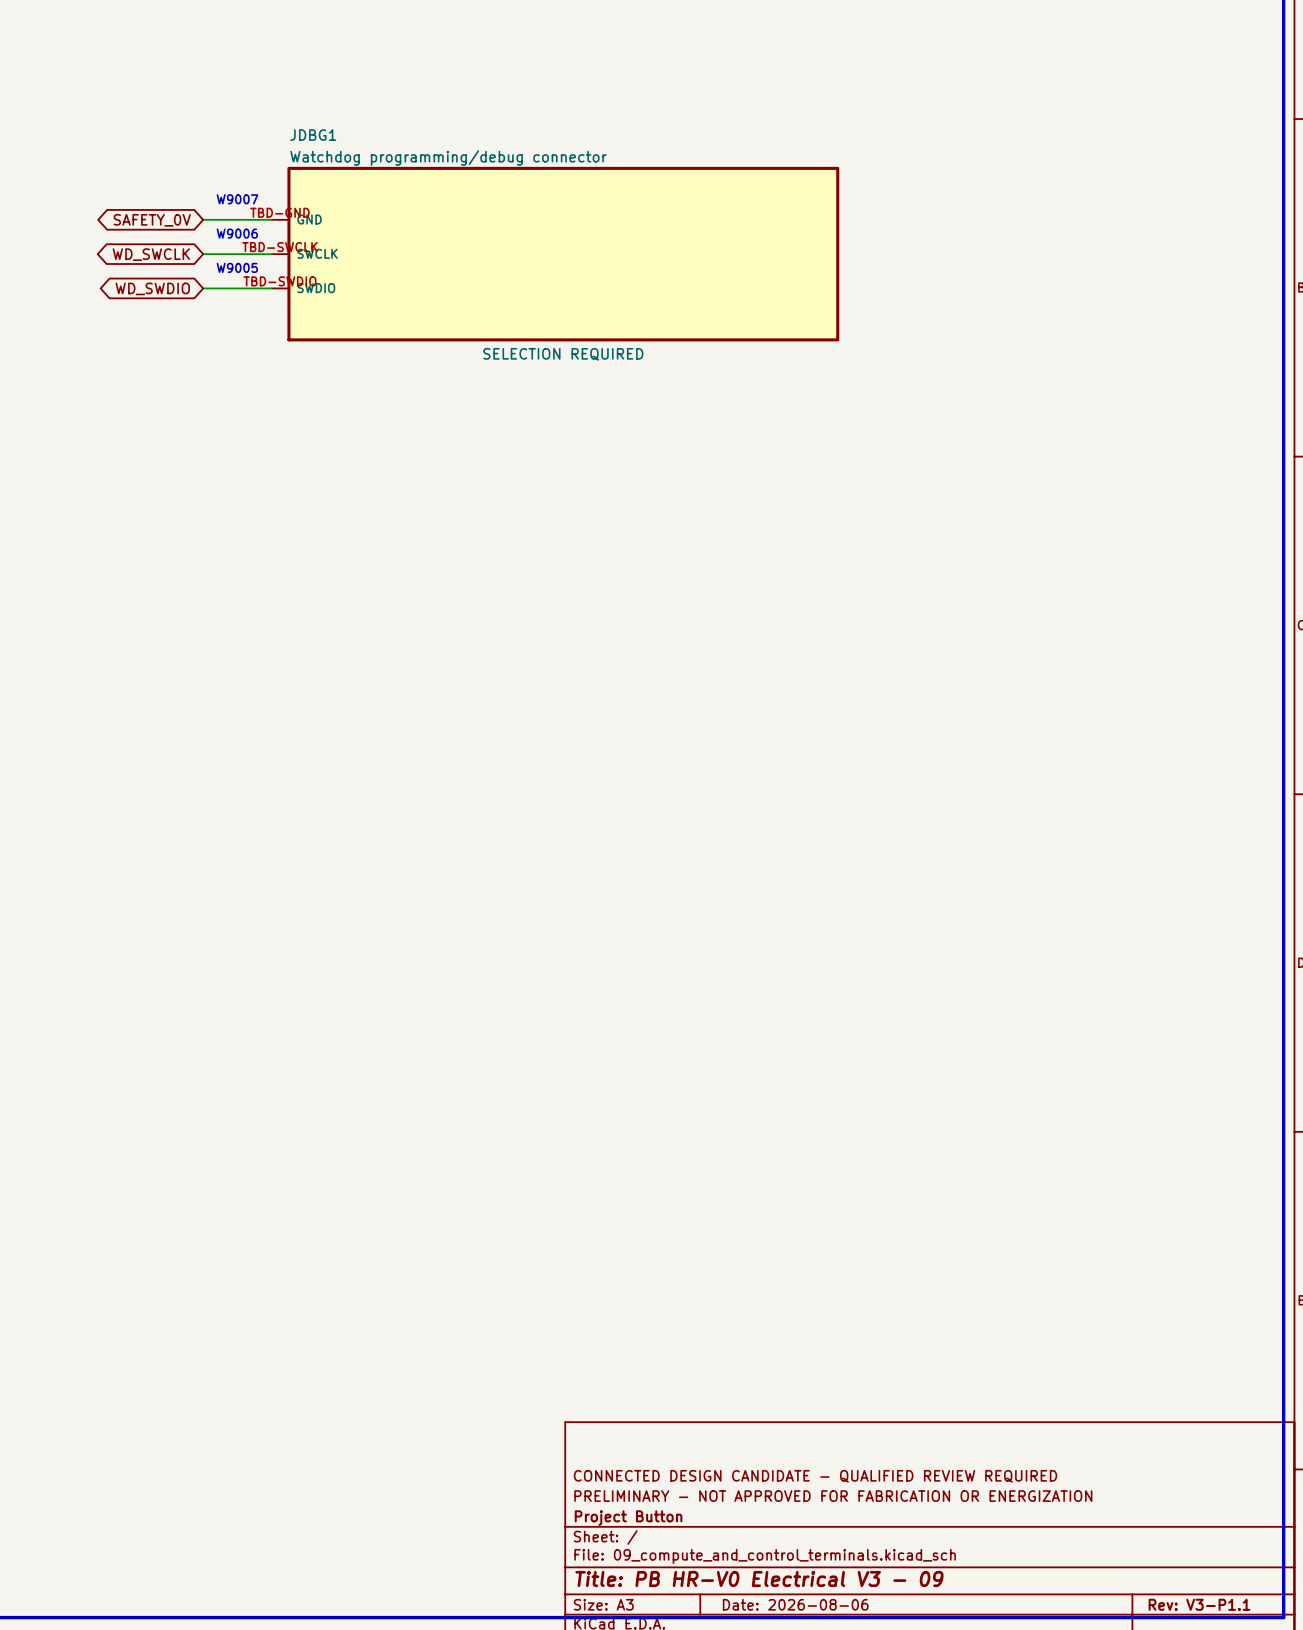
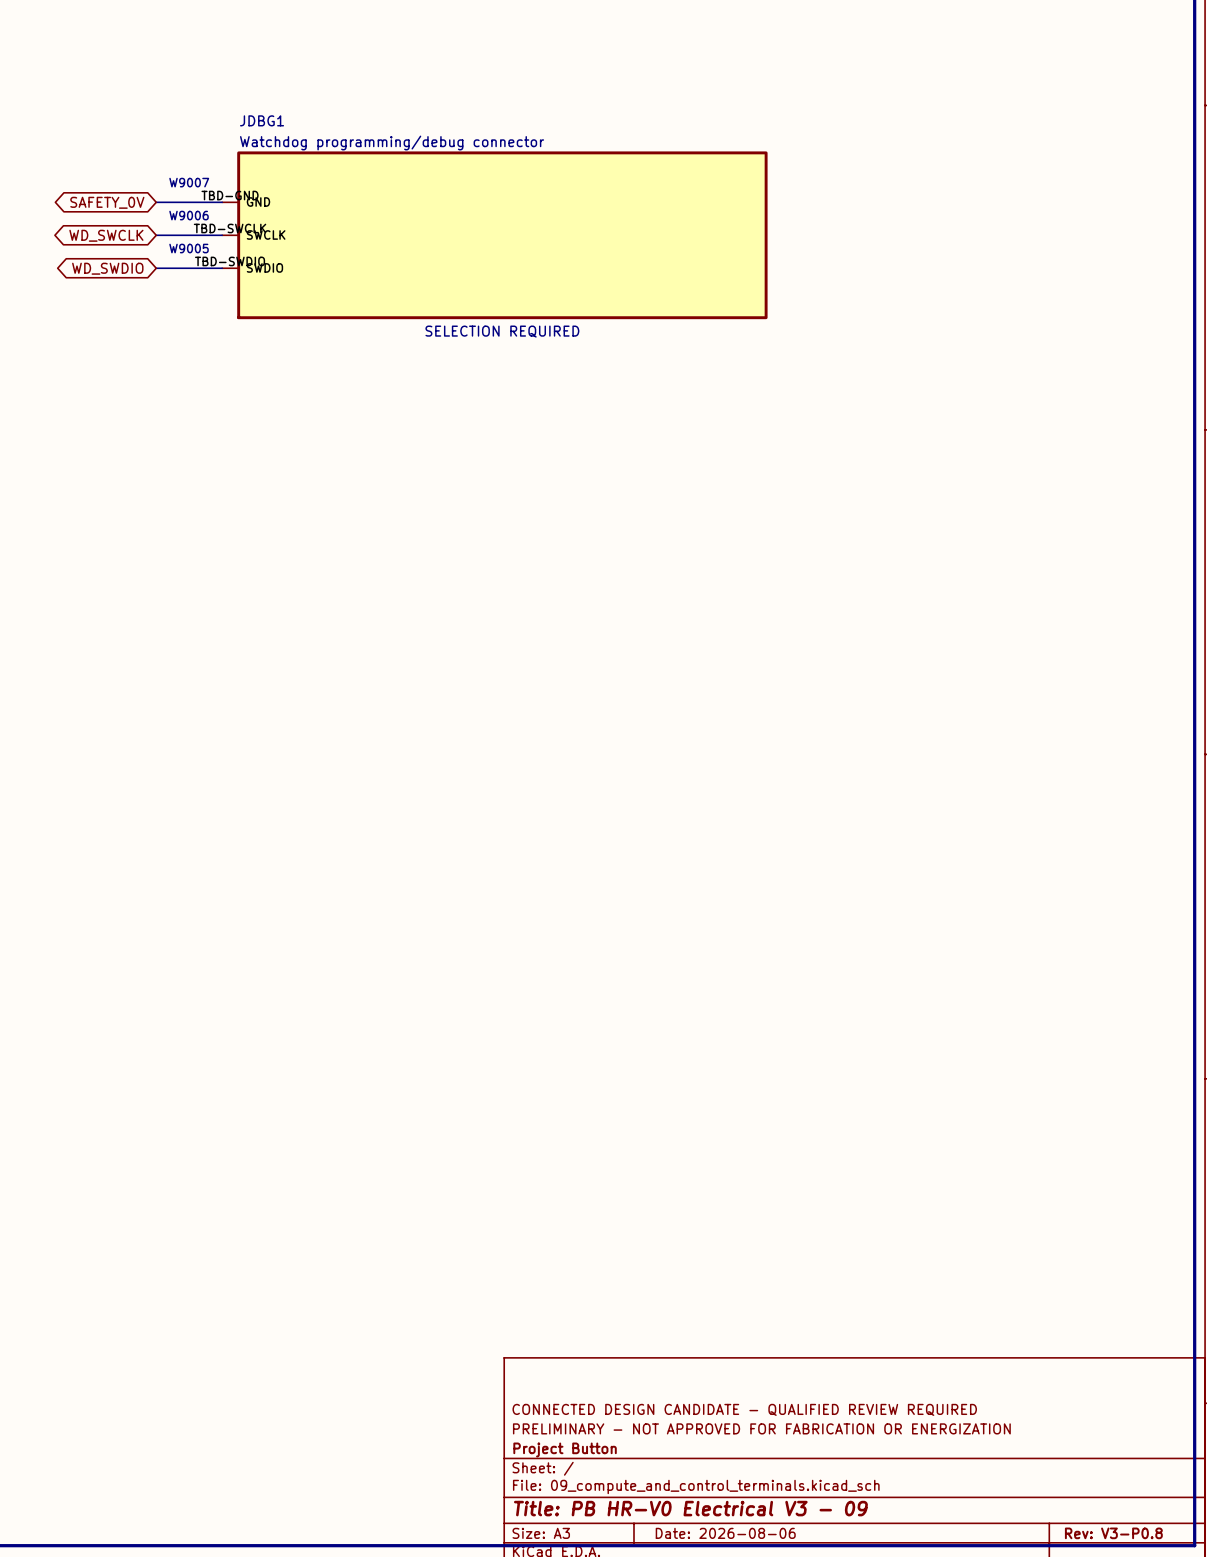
title block: Rev: V3-P1.1 (1199, 1604) -> Rev: V3-P0.8 (1113, 1533)

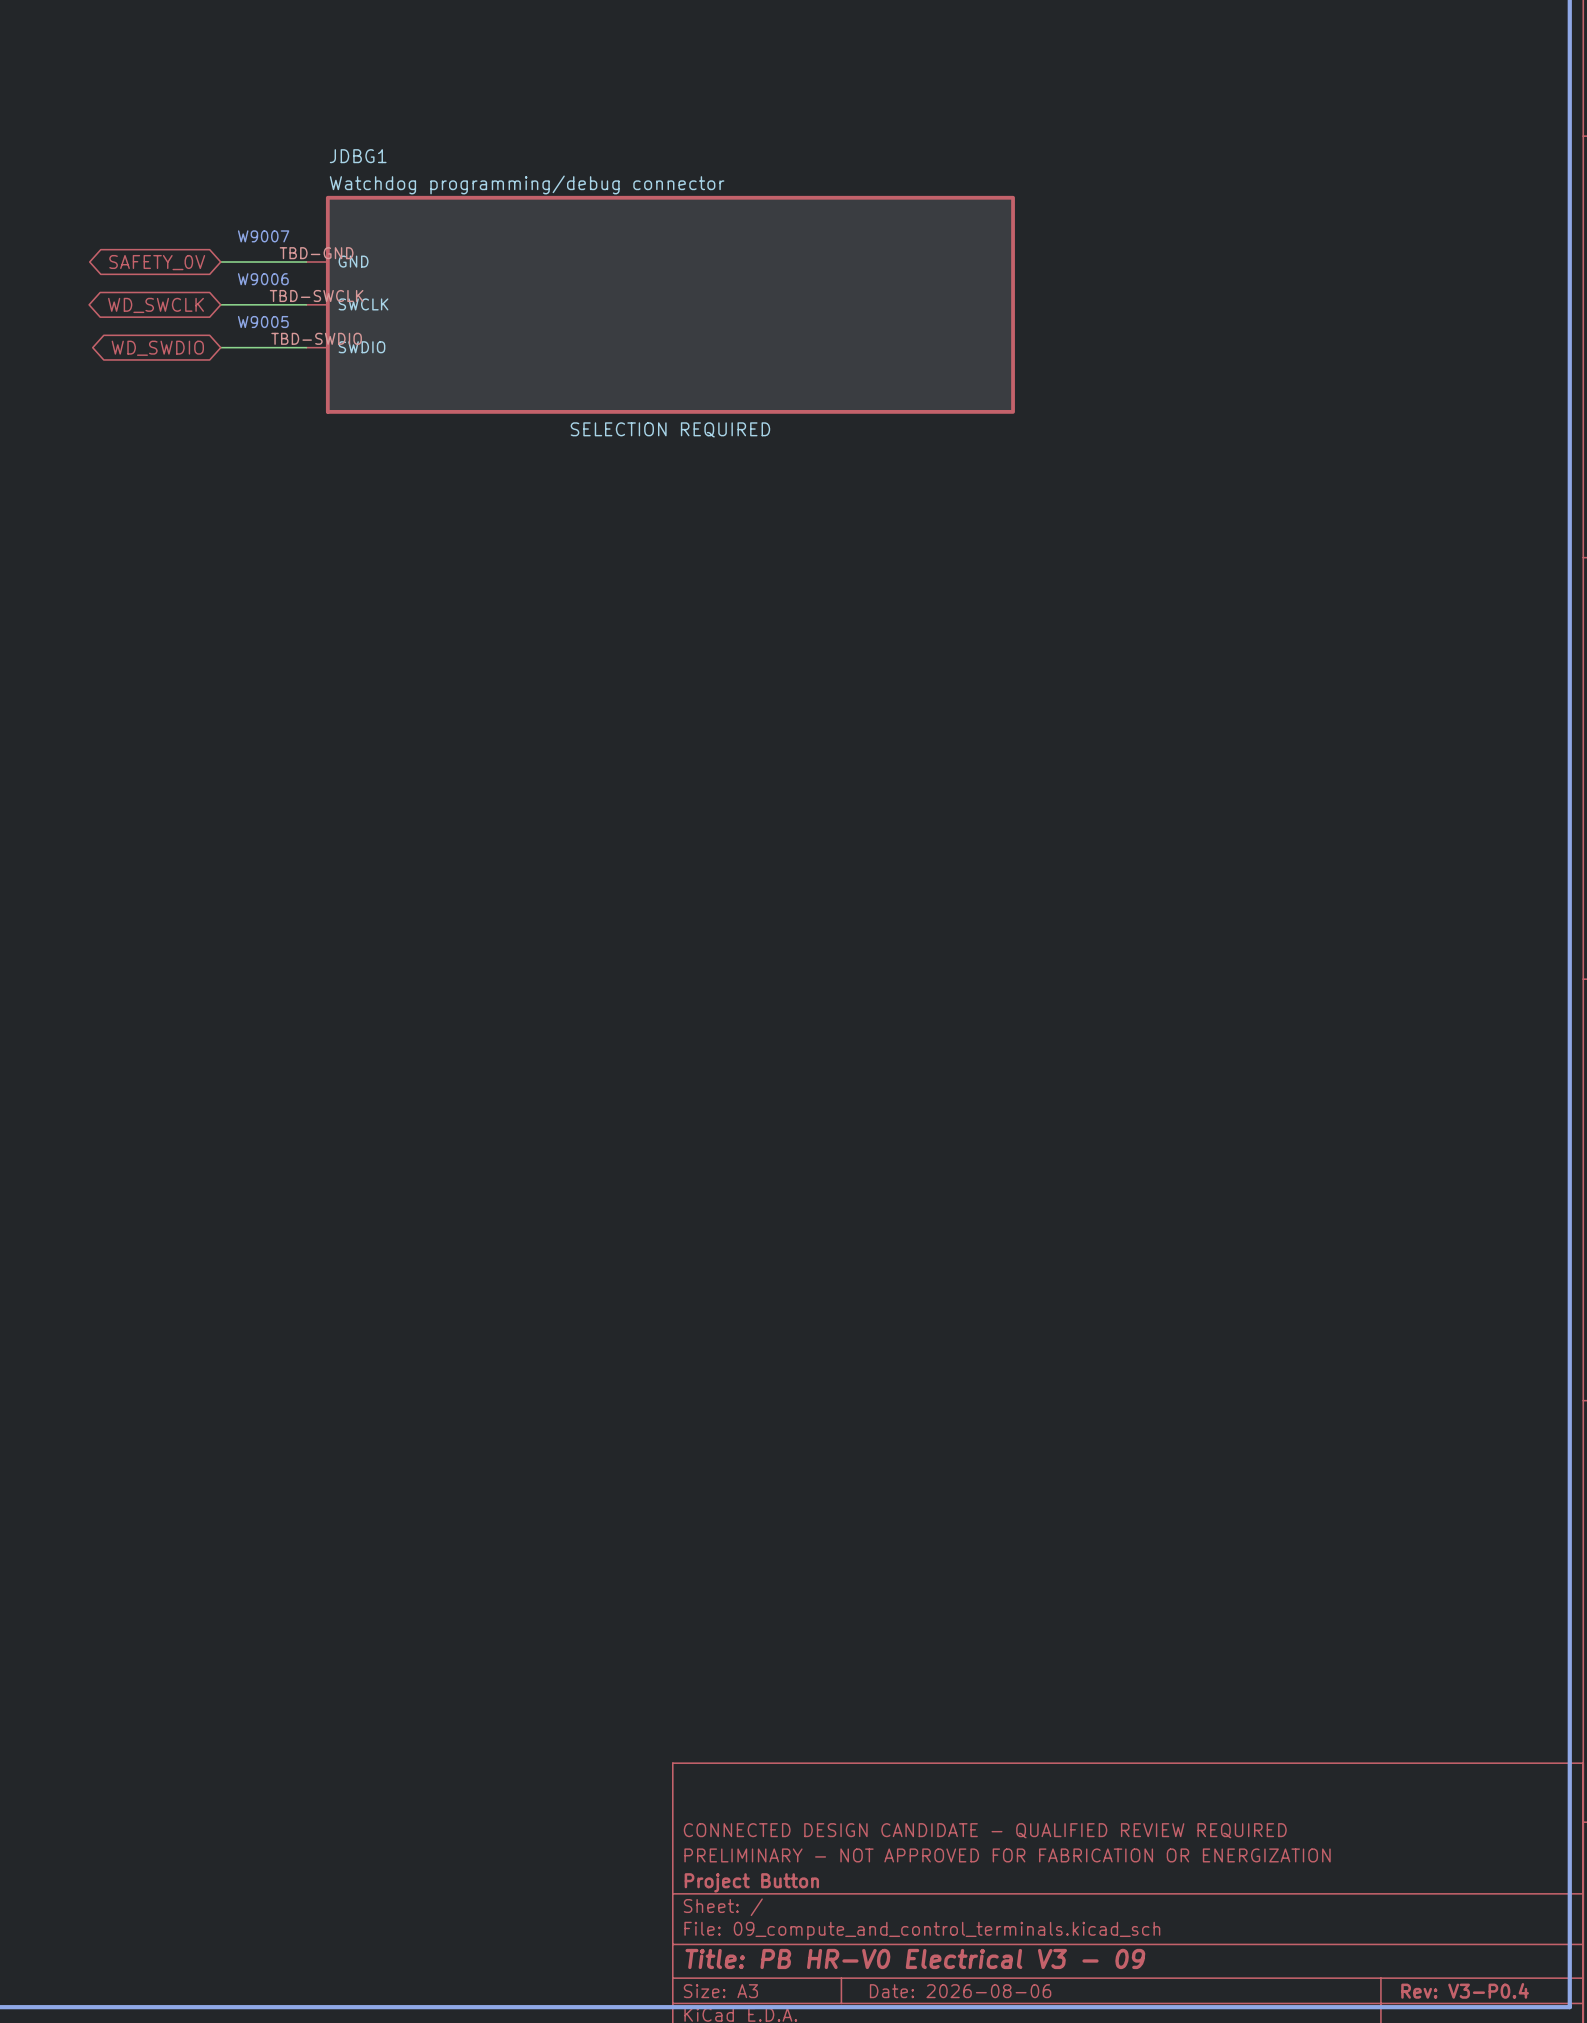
title block: Rev: V3-P0.8 (1113, 1533) -> Rev: V3-P0.4 (1465, 1990)

